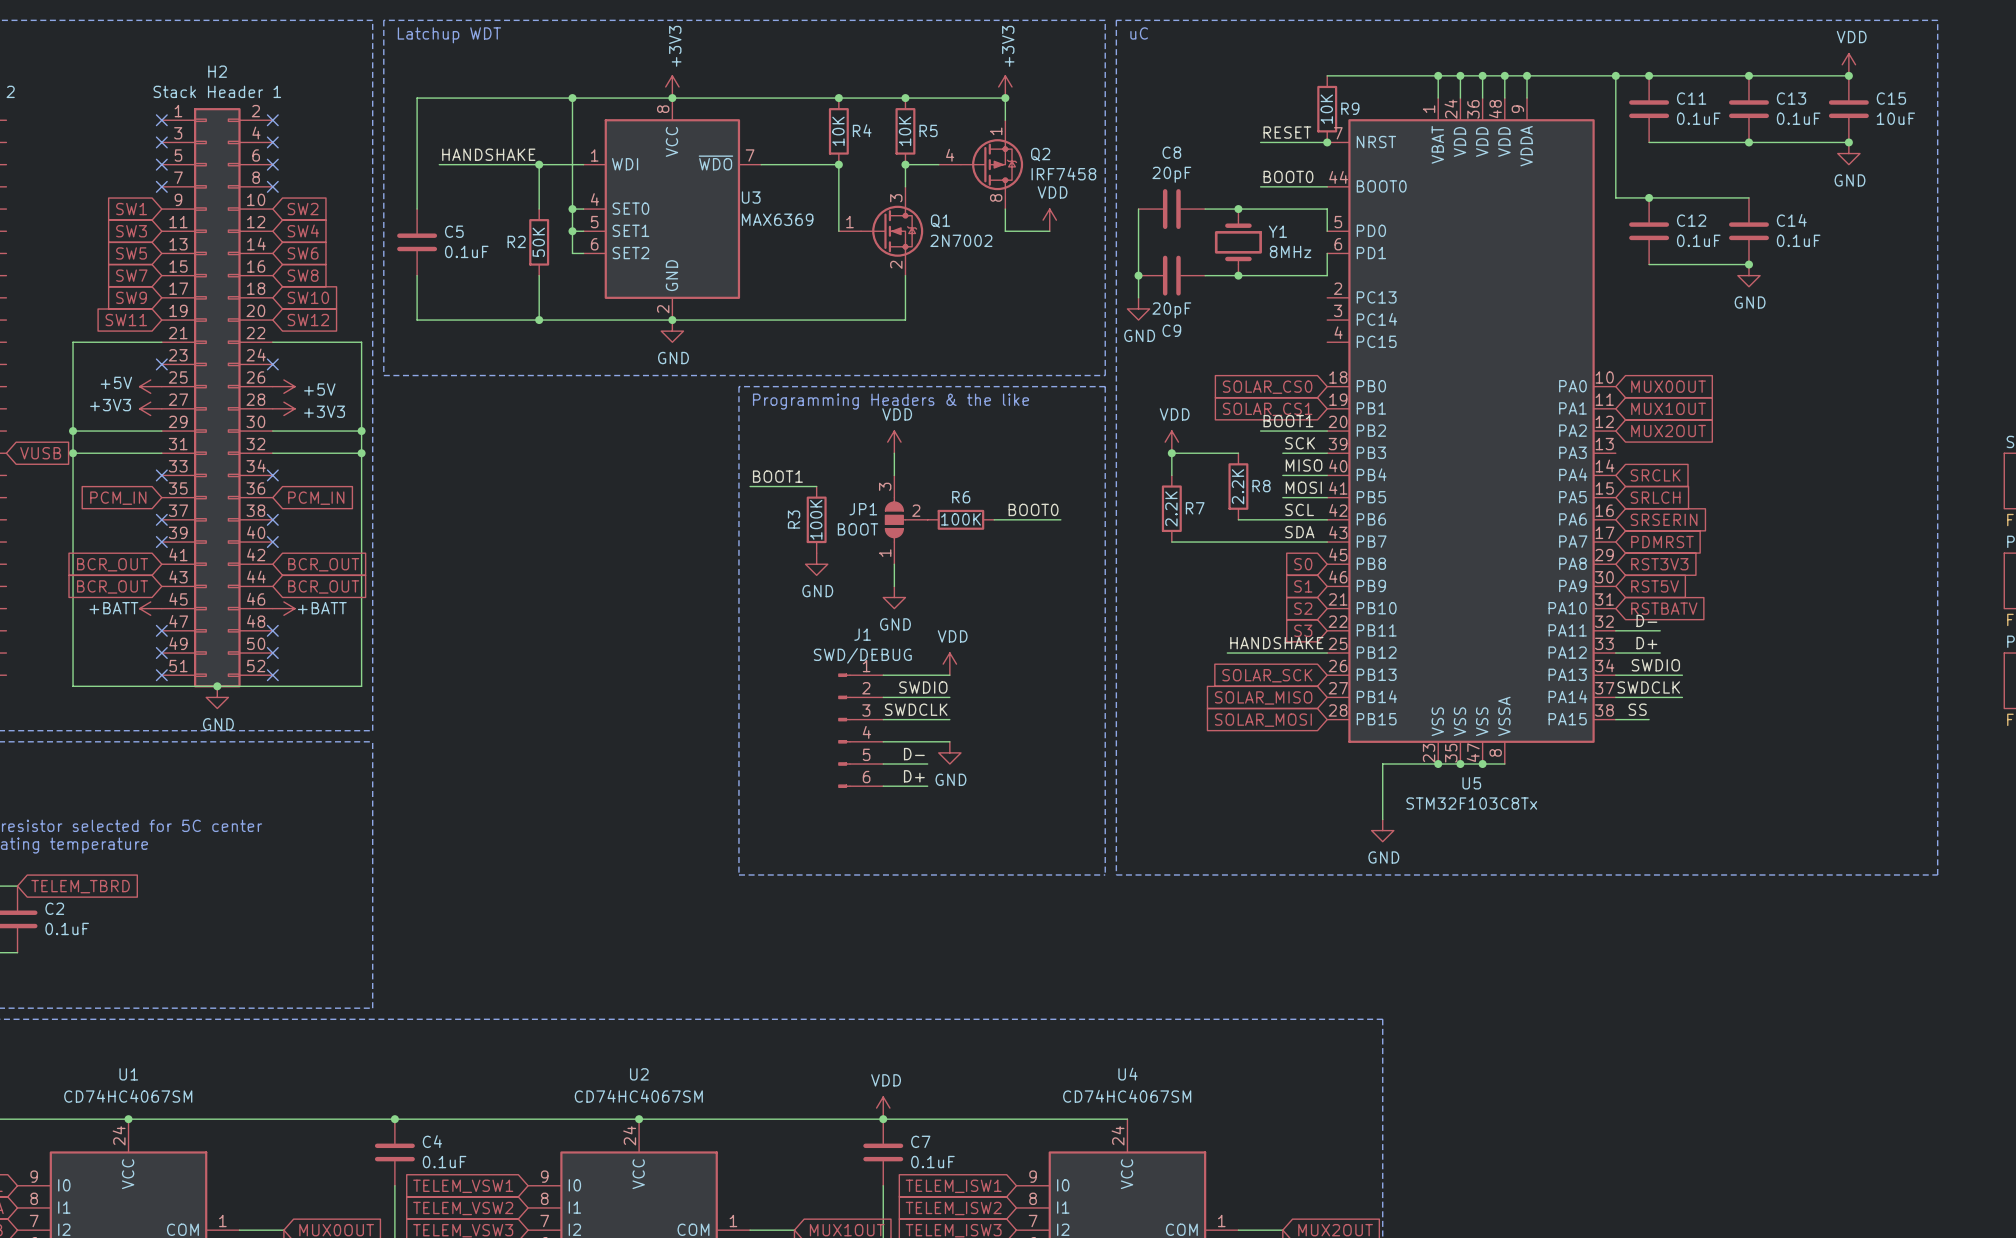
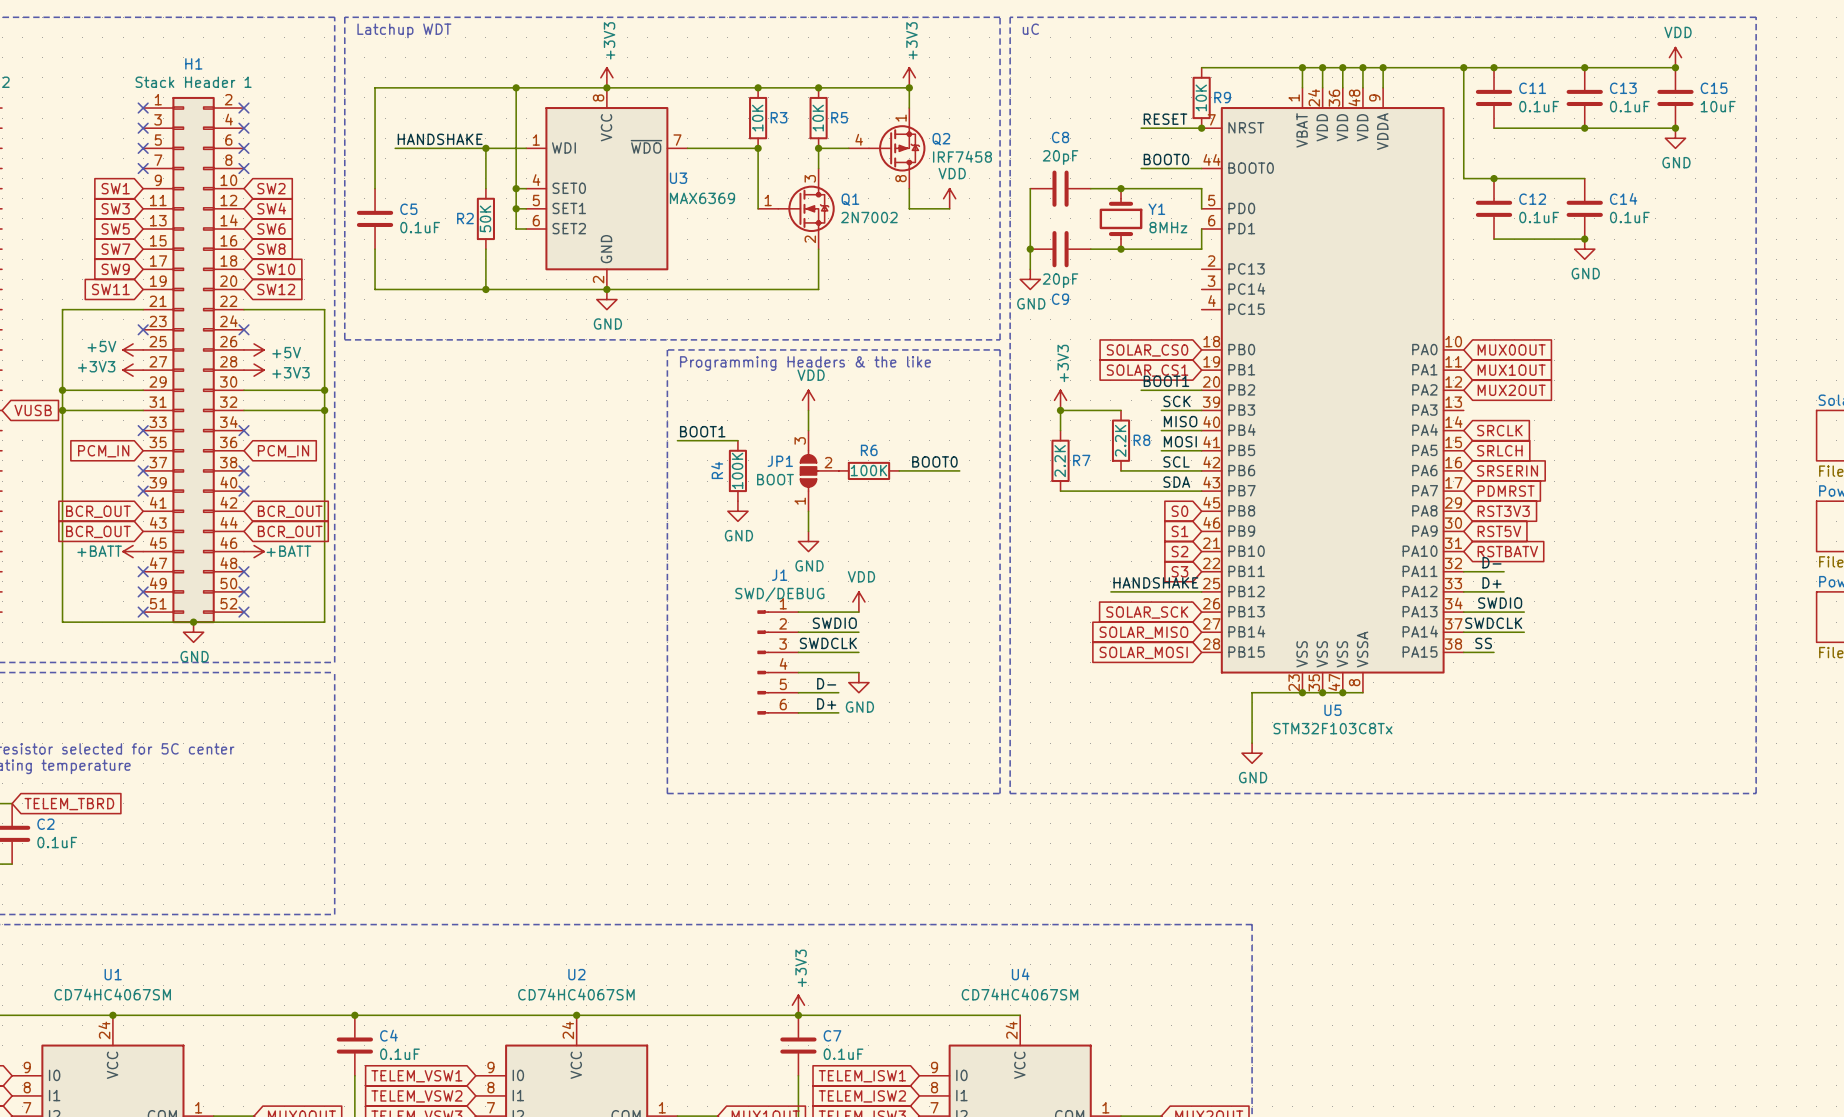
H2 name: H2 (217, 71) -> H1 (193, 63)
R4 name: R4 (862, 130) -> R3 (779, 117)
power symbol: VDD (1171, 442) -> +3V3 (1060, 400)
R3 name: R3 (794, 519) -> R4 (717, 470)
power symbol: VDD (883, 1108) -> +3V3 (798, 1005)

